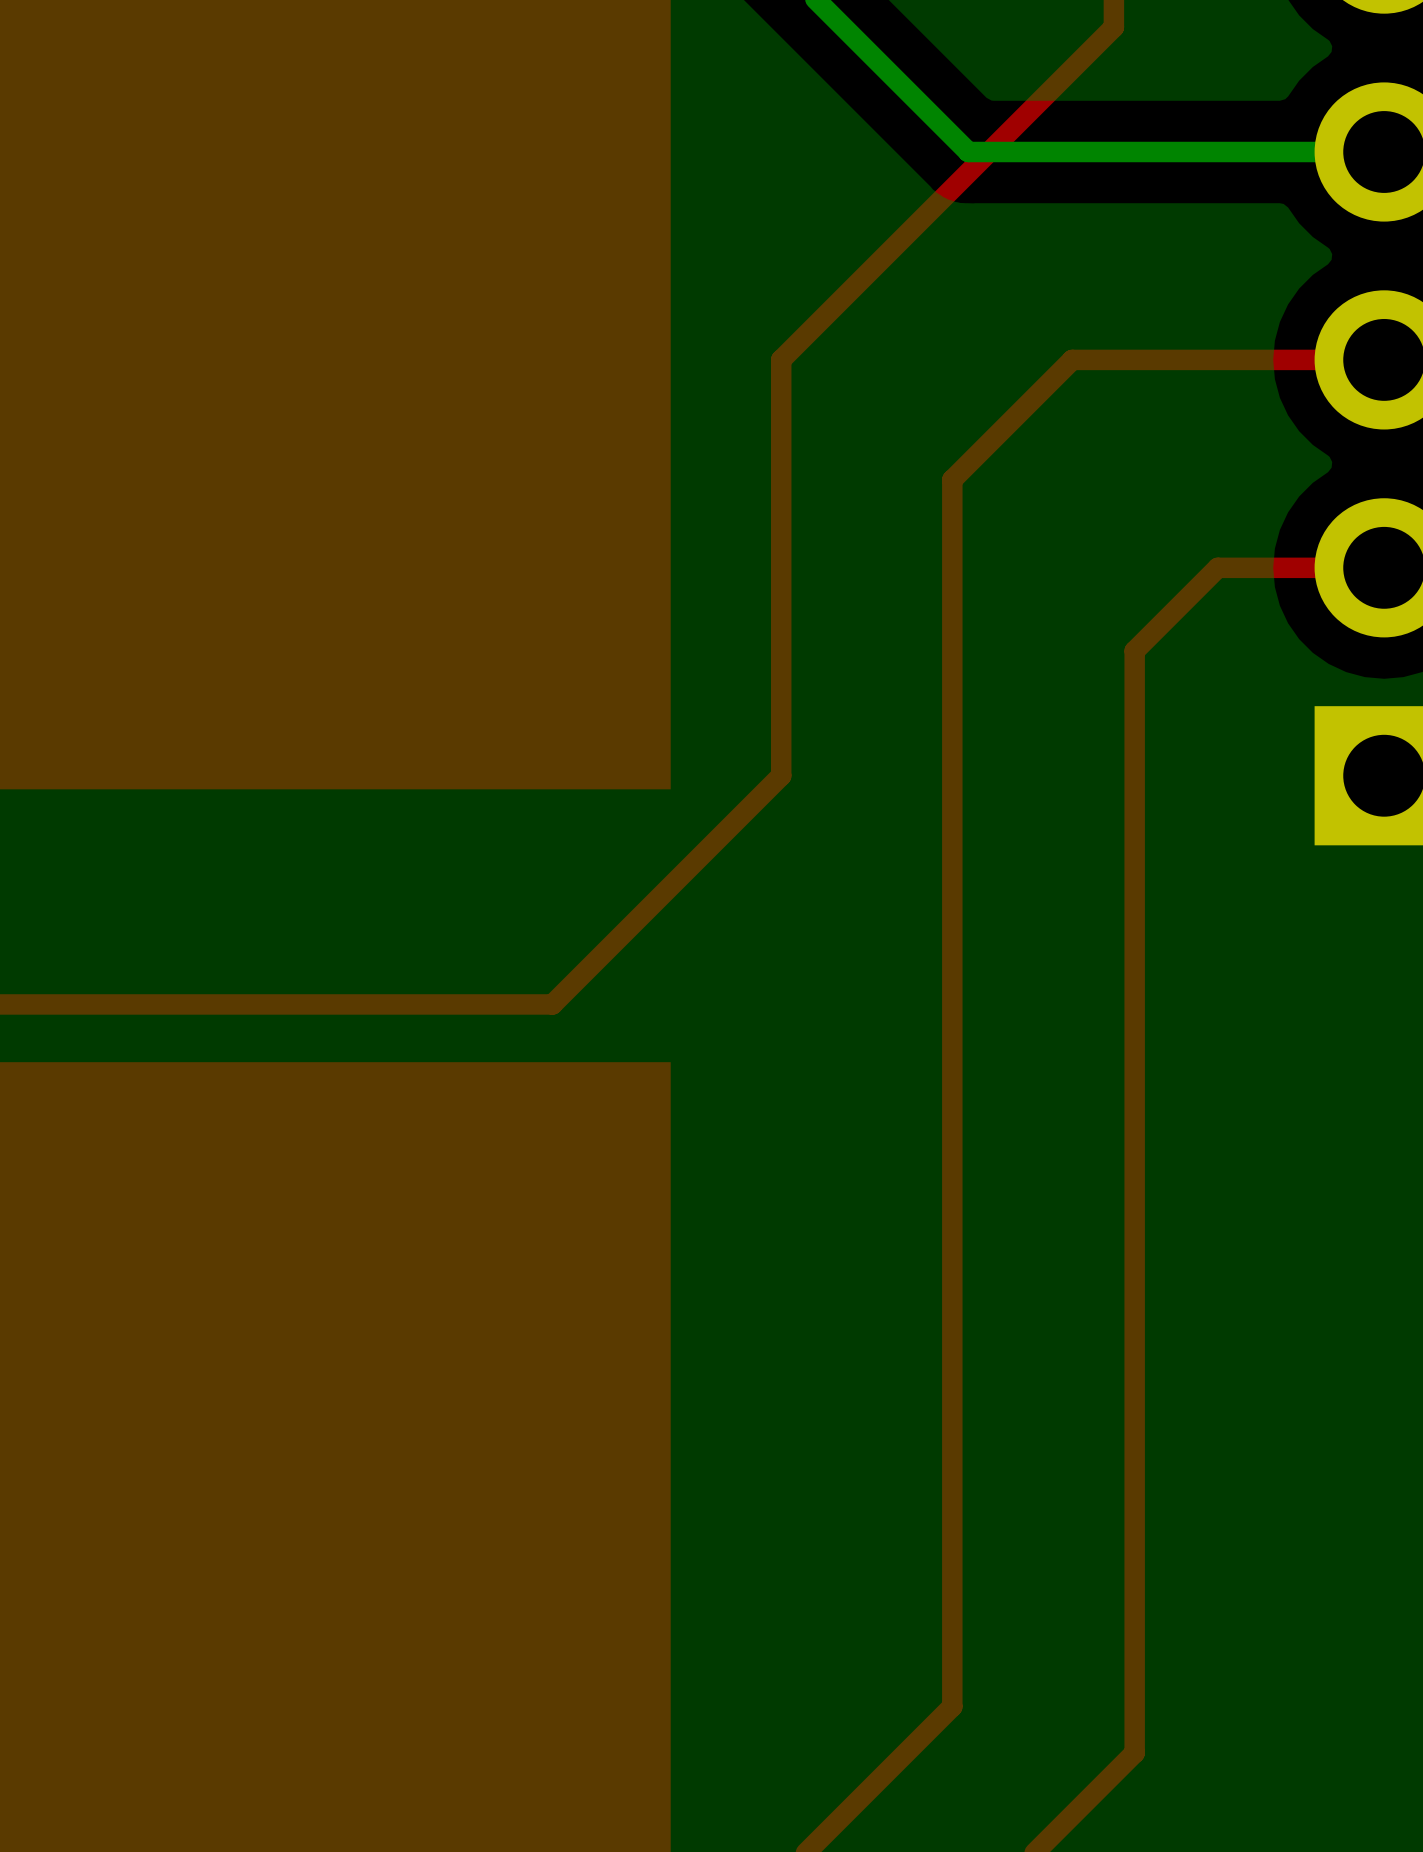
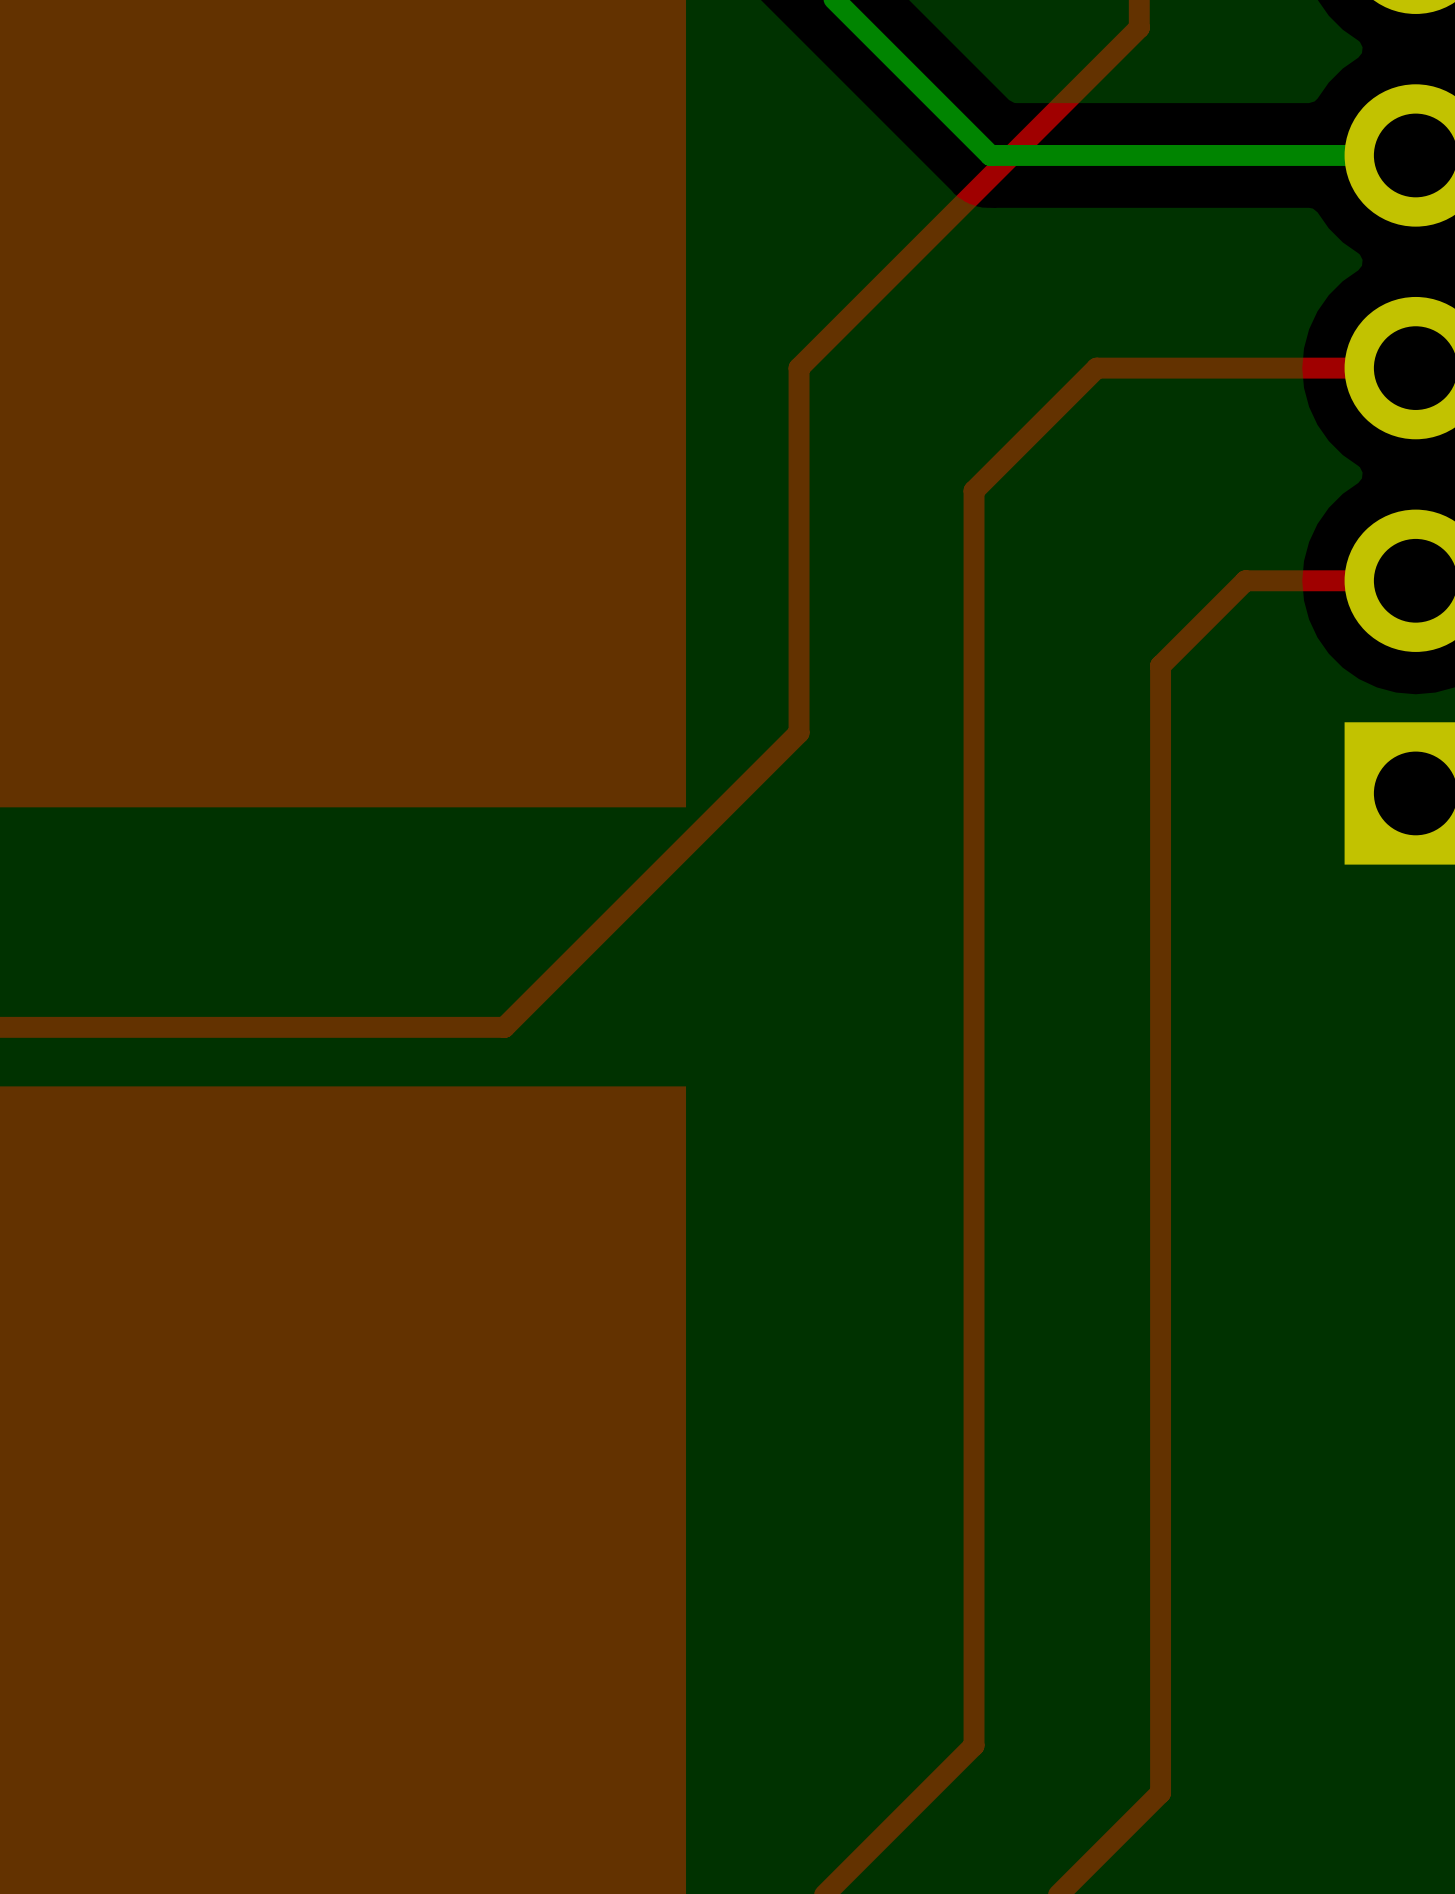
top track: (781, 716) (781, 775) (552, 1004) (493, 1004) -> (799, 732) (504, 1027)

